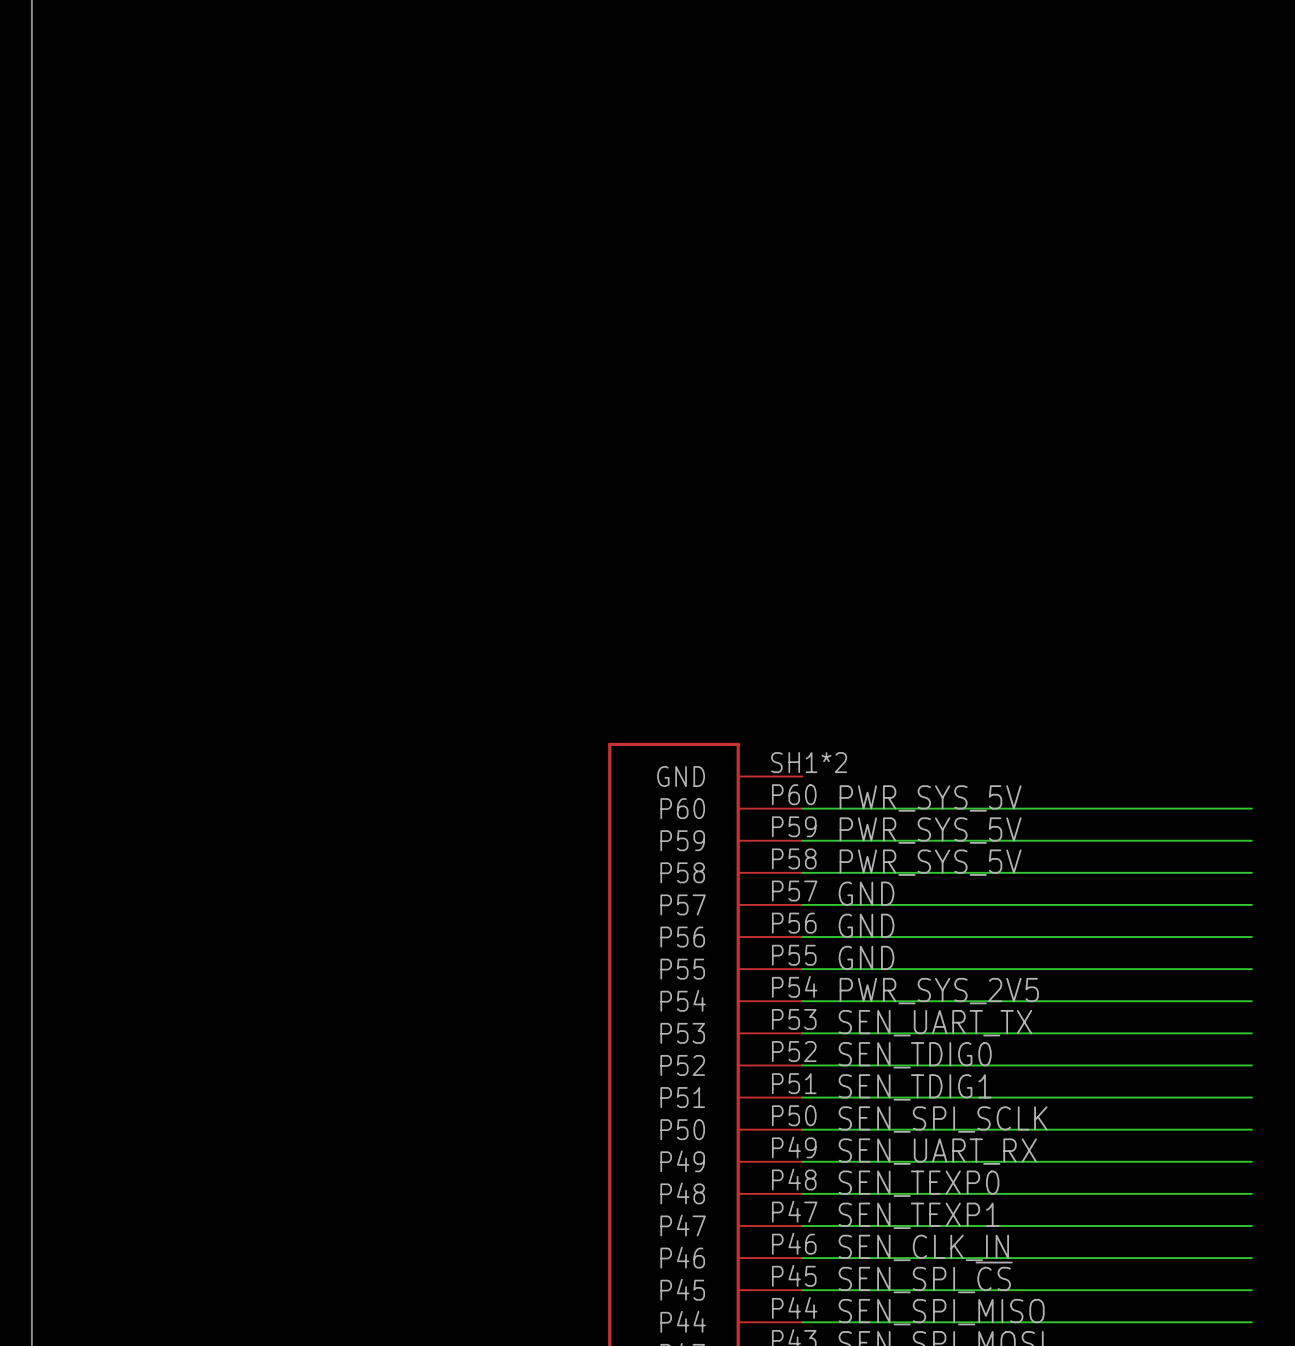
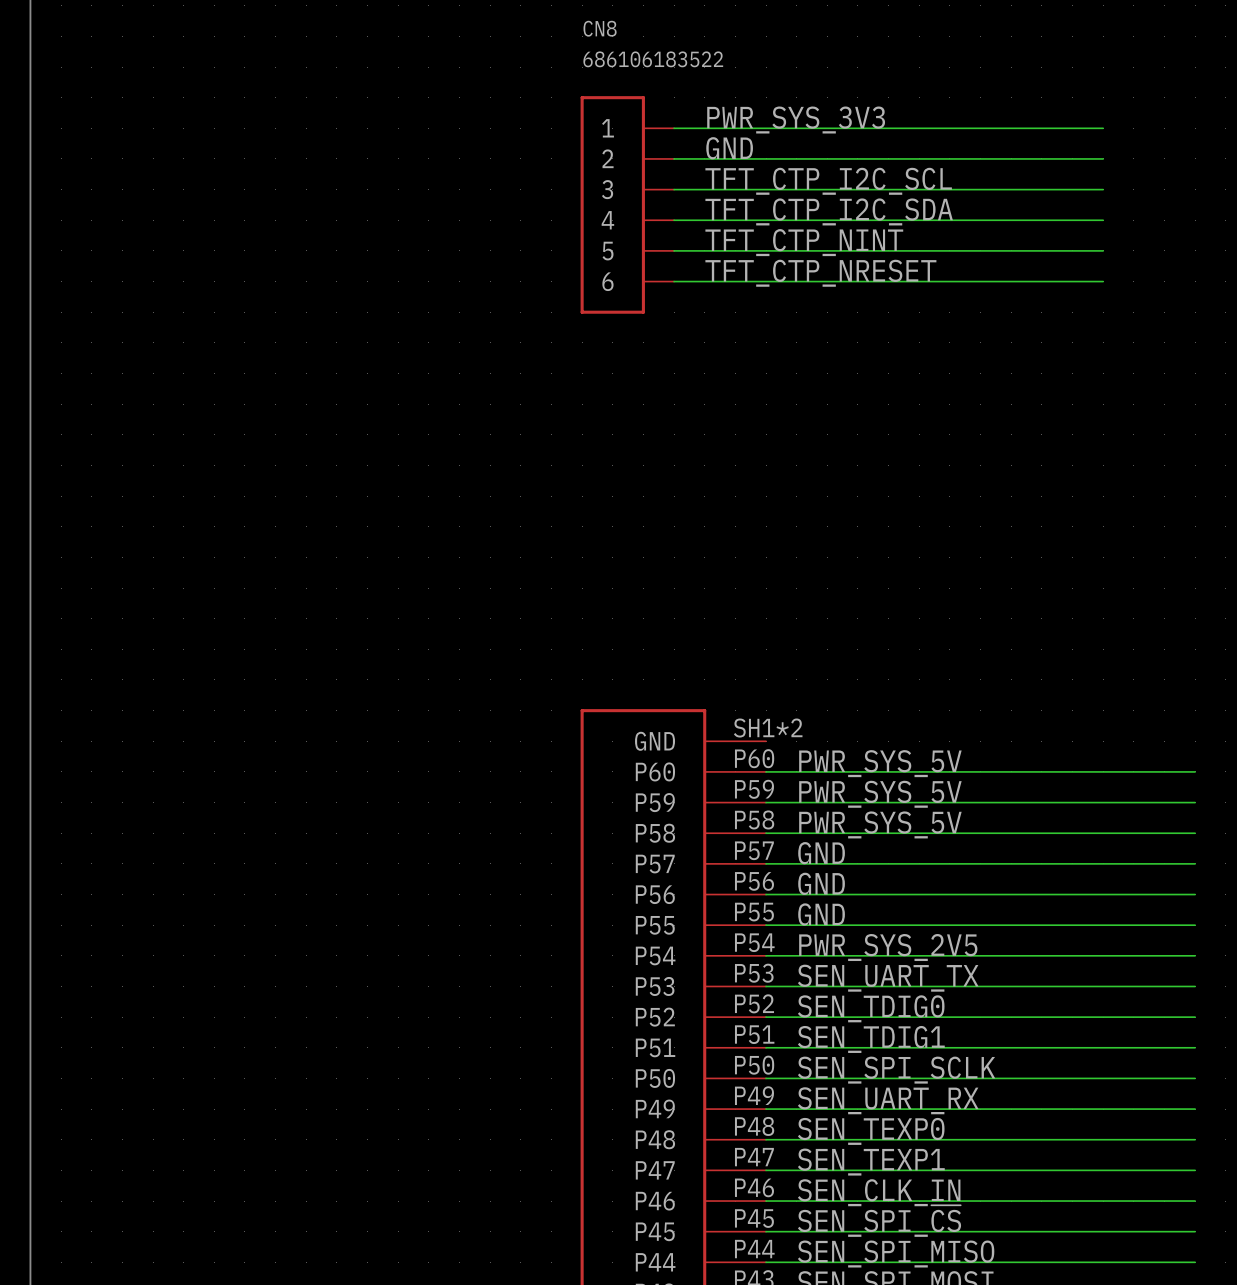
label: none -> PWR_SYS_3V3 (796, 120)
wire: none -> (674, 128) (1103, 128)
label: none -> GND (729, 148)
wire: none -> (674, 158) (1103, 158)
label: none -> TFT_CTP_I2C_SCL (828, 181)
wire: none -> (674, 189) (1103, 189)
CN8: none -> 686106183522 (627, 204)
label: none -> TFT_CTP_I2C_SDA (829, 211)
wire: none -> (674, 220) (1103, 220)
label: none -> TFT_CTP_NINT (804, 242)
wire: none -> (674, 250) (1103, 250)
label: none -> TFT_CTP_NRESET (820, 273)
wire: none -> (674, 281) (1103, 281)

